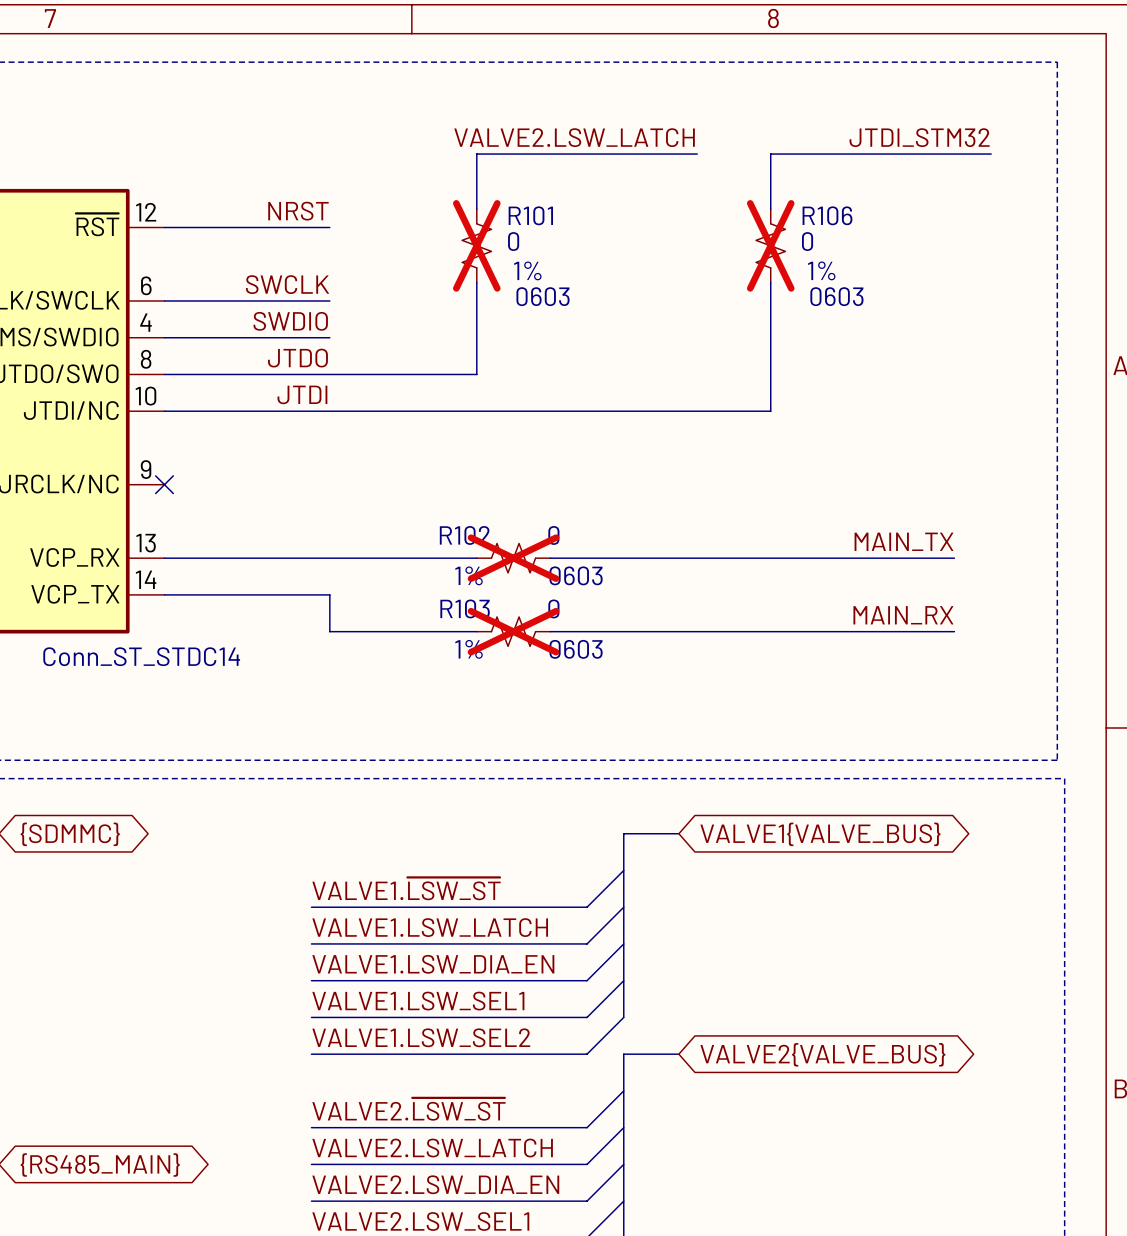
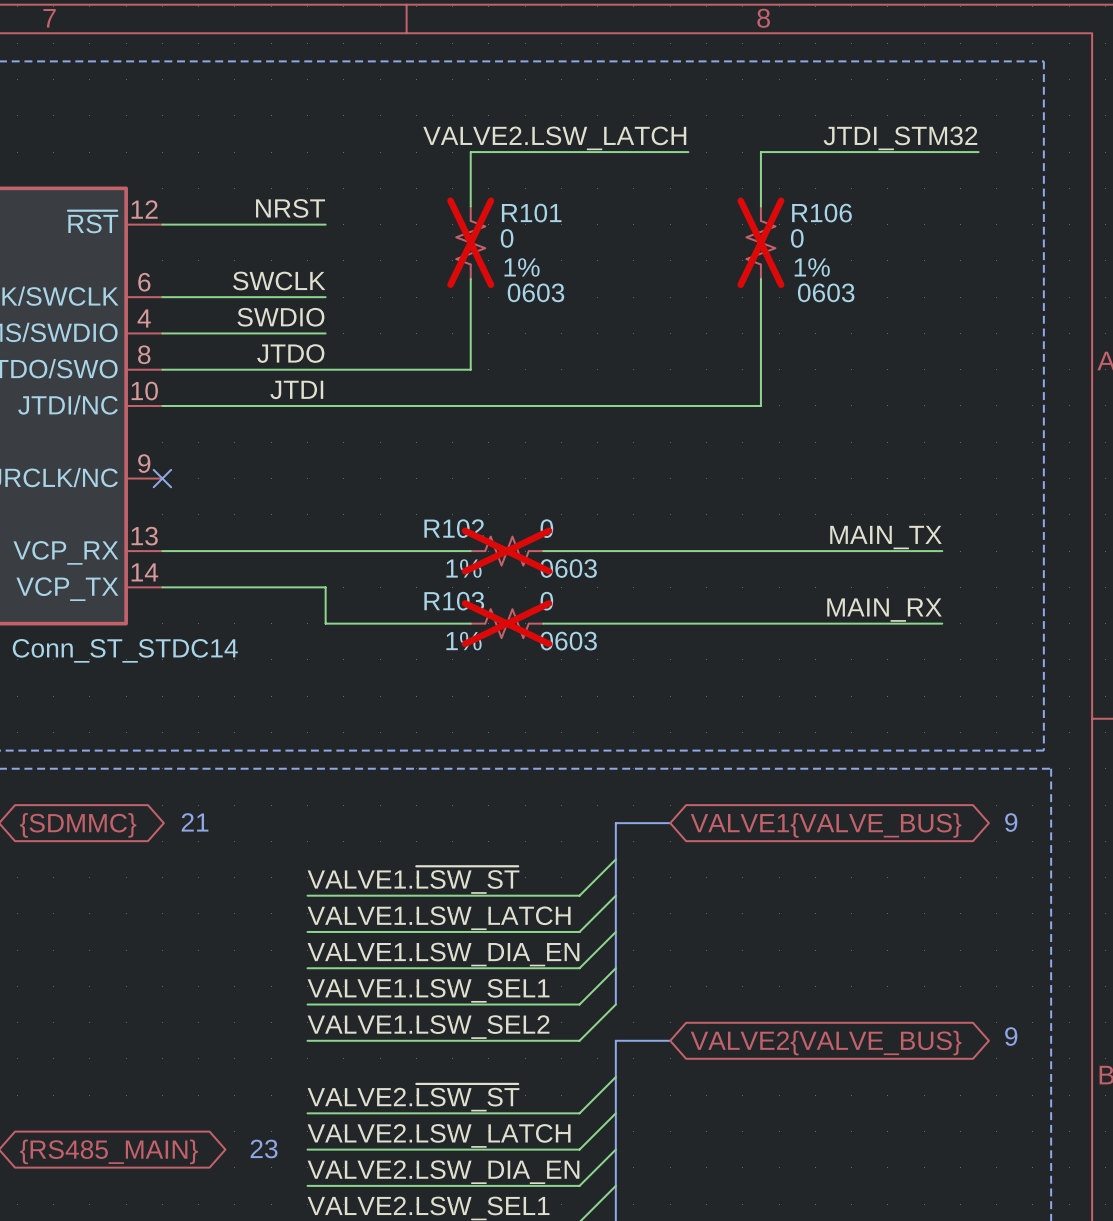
text: none -> 21 (195, 822)
text: none -> 9 (1011, 822)
text: none -> 9 (1011, 1036)
text: none -> 23 (264, 1148)

